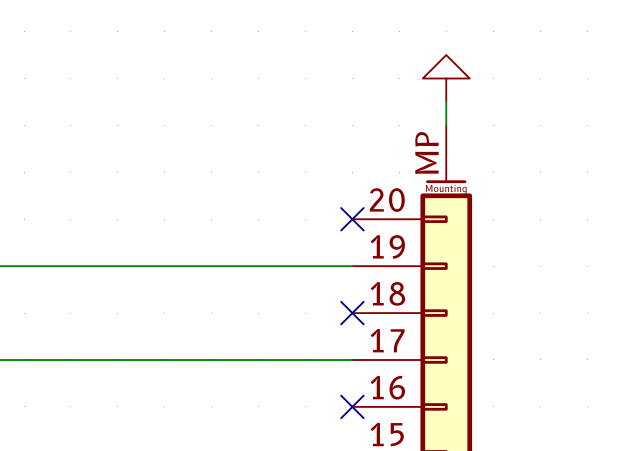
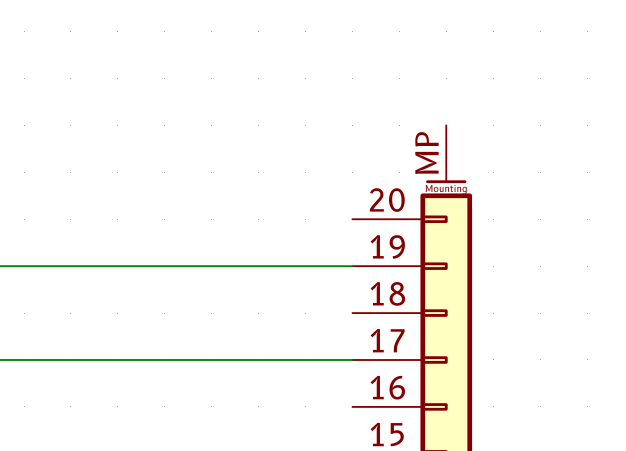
power symbol: (446, 78) -> none
wire: (446, 101) (446, 125) -> none
no-connect mark: (352, 219) -> none
no-connect mark: (352, 313) -> none
no-connect mark: (352, 406) -> none

